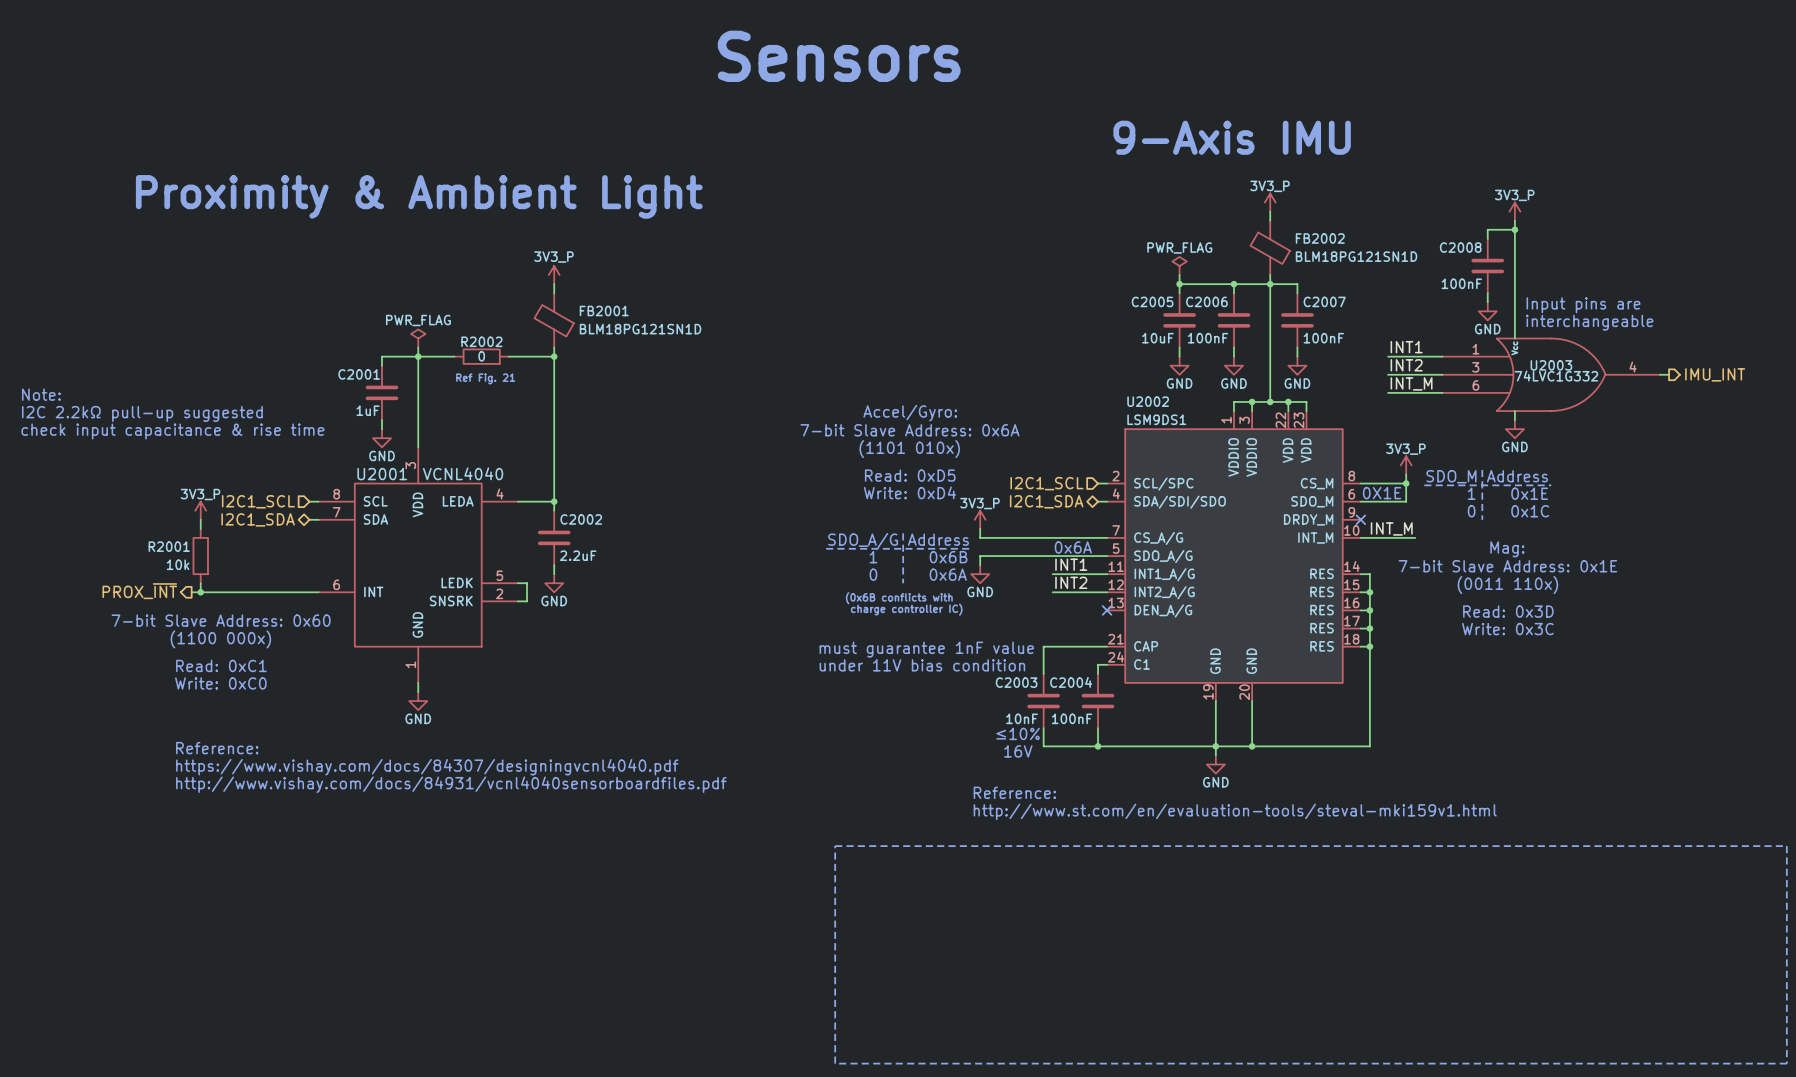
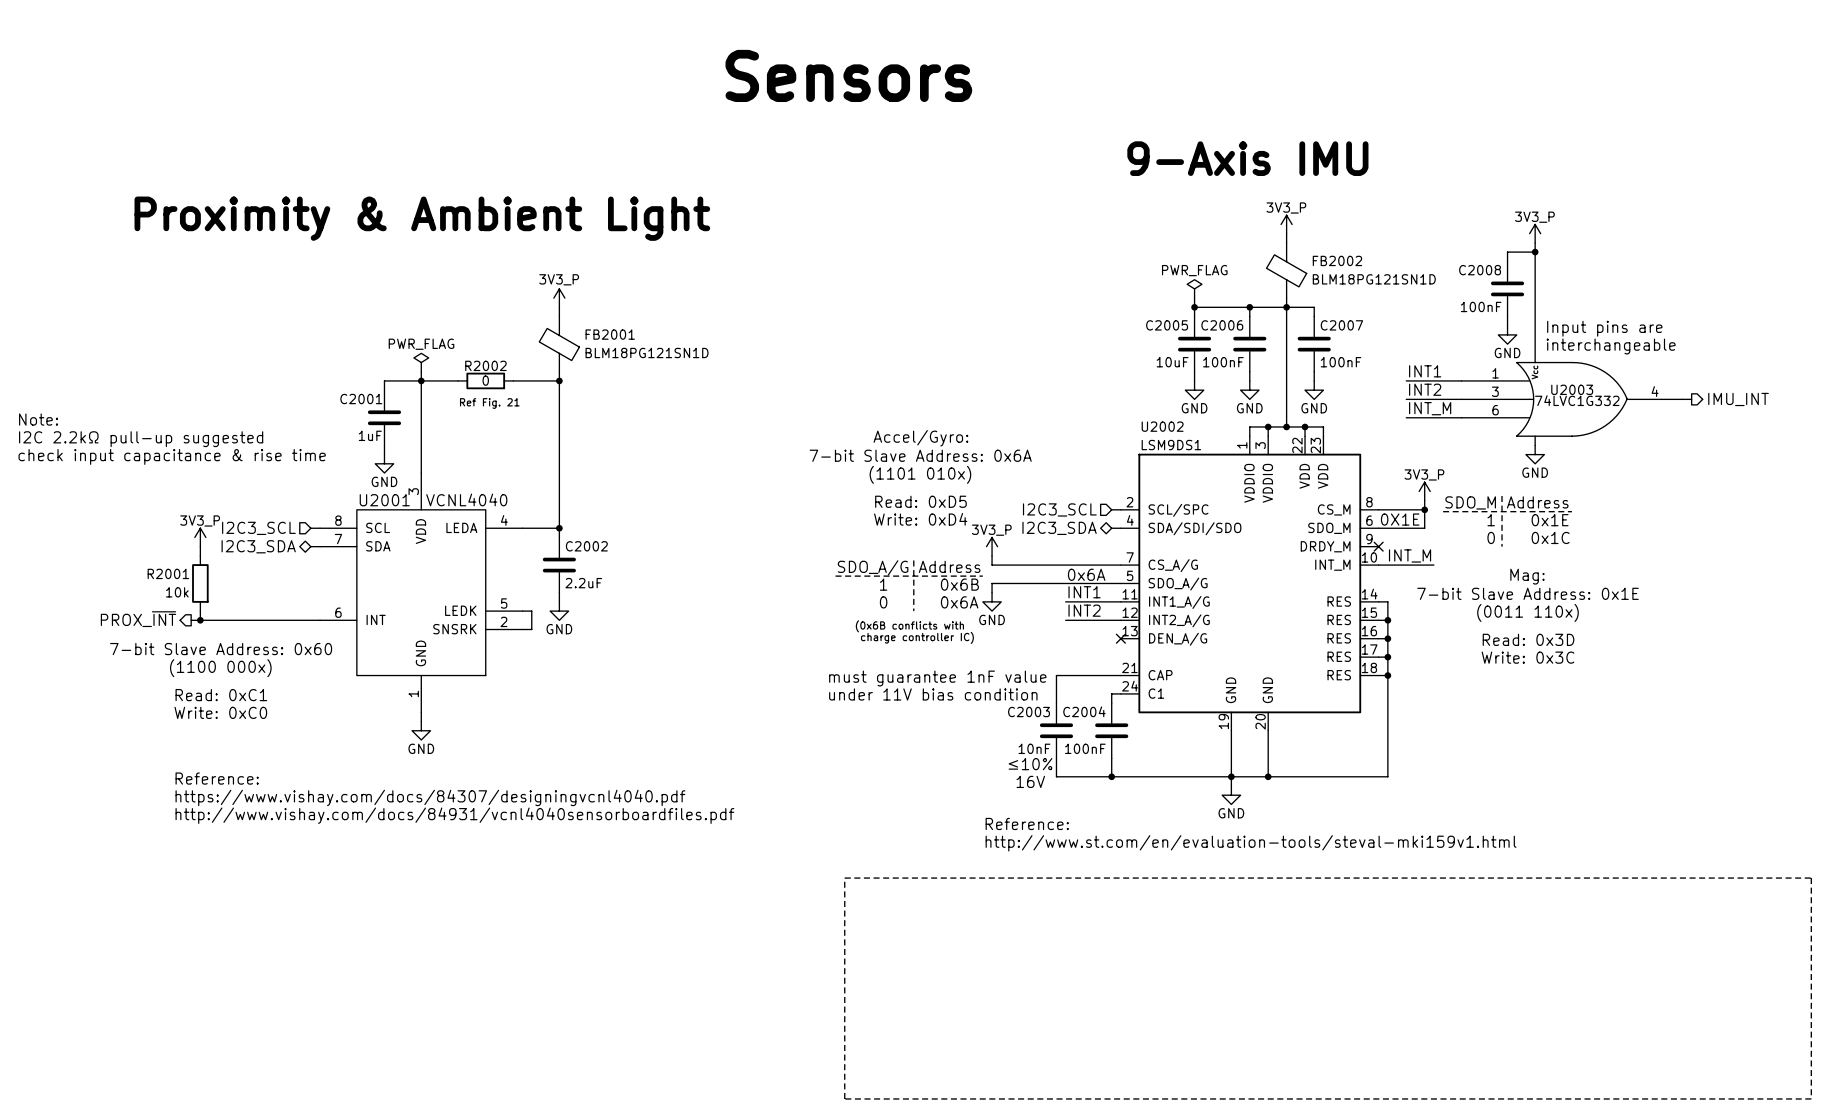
hierarchical label: I2C1_SCL (1046, 483) -> I2C3_SCL (1059, 509)
hierarchical label: I2C1_SCL (258, 501) -> I2C3_SCL (258, 528)
hierarchical label: I2C1_SDA (1046, 501) -> I2C3_SDA (1059, 528)
hierarchical label: I2C1_SDA (258, 519) -> I2C3_SDA (258, 546)

